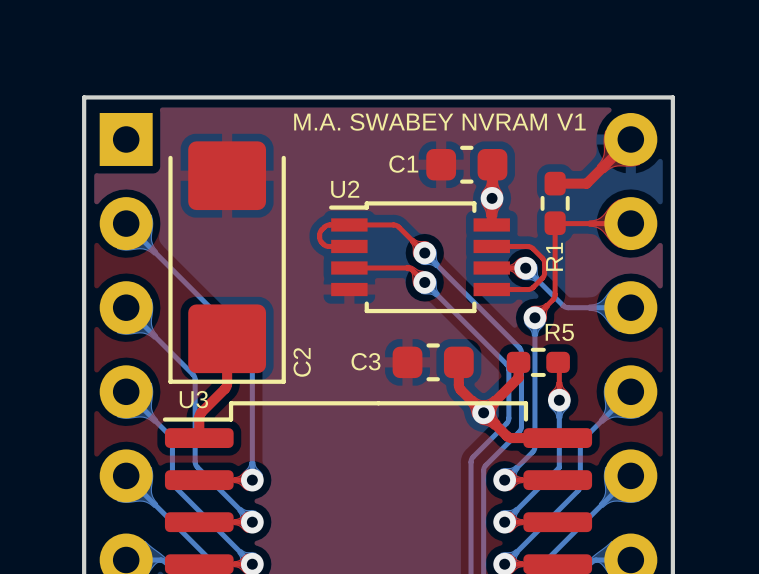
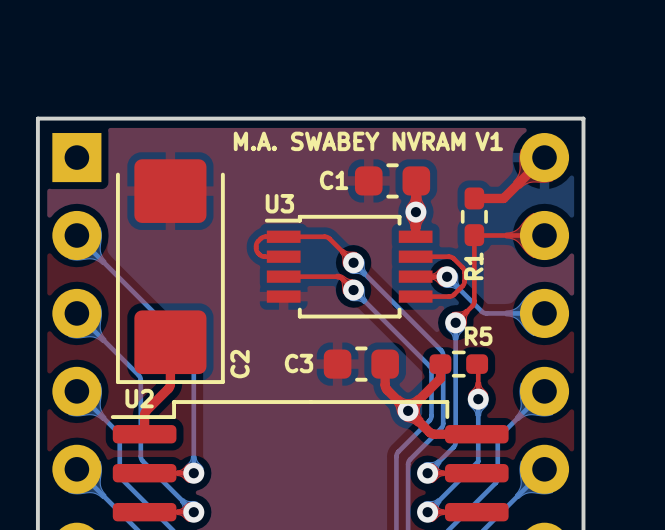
U2 name: U2 (345, 189) -> U3 (279, 203)
U3 name: U3 (193, 399) -> U2 (139, 398)

